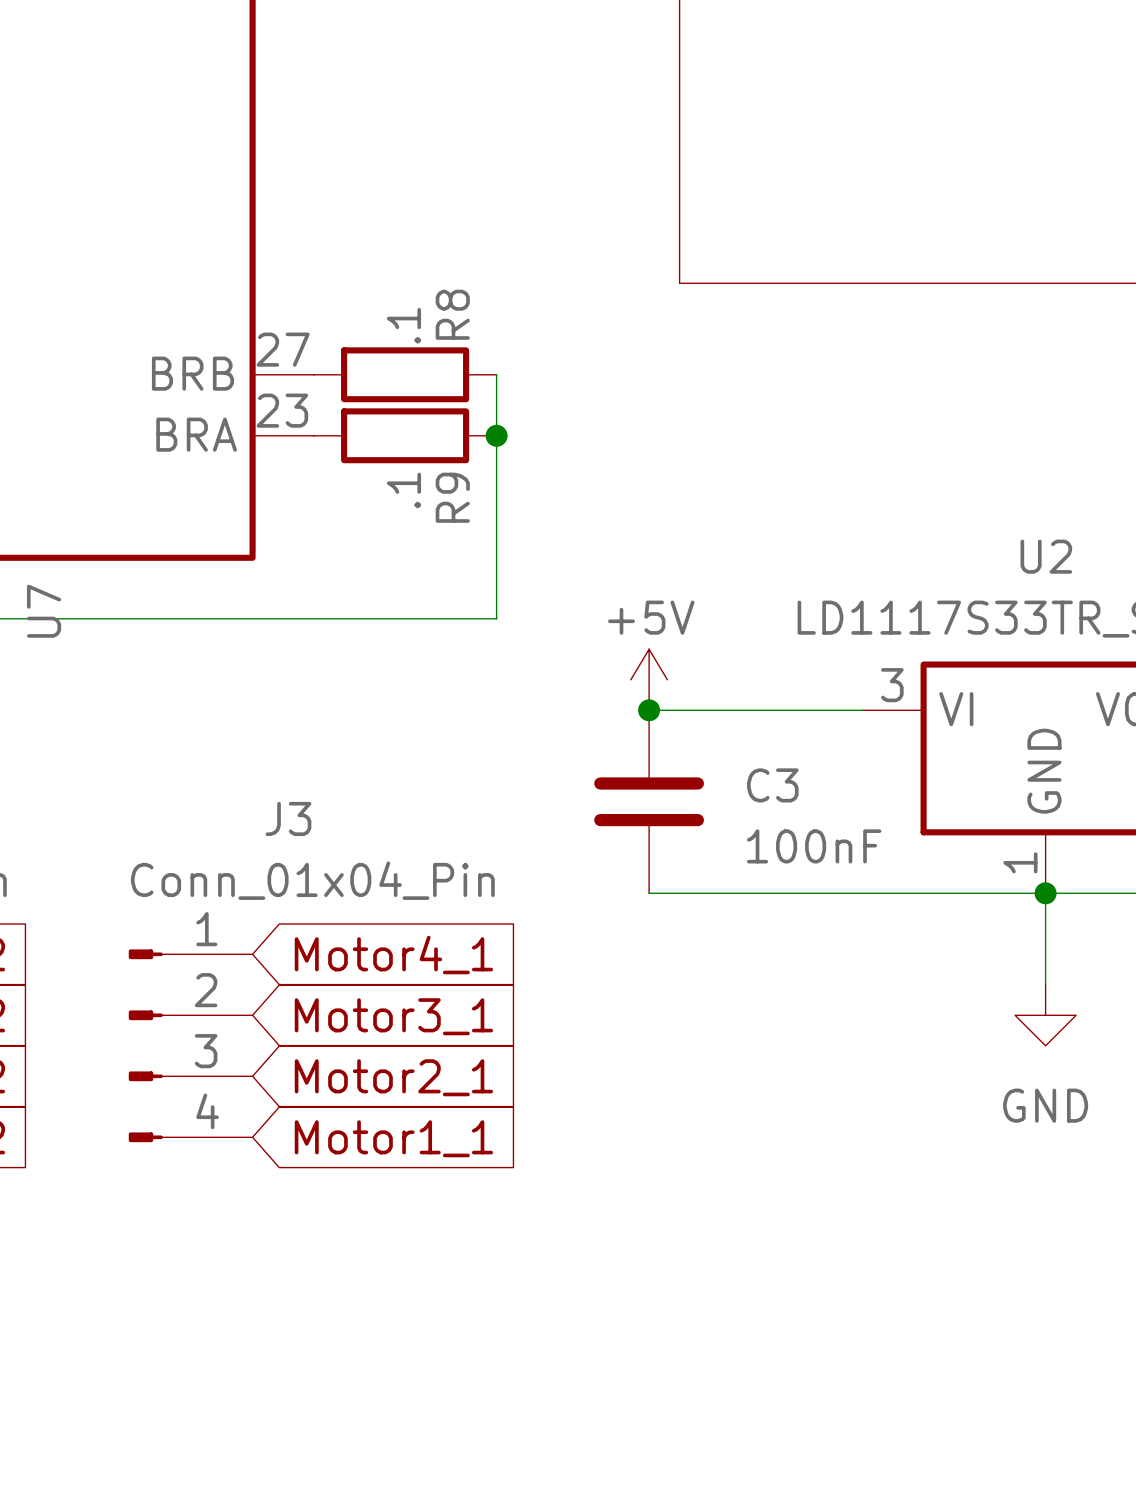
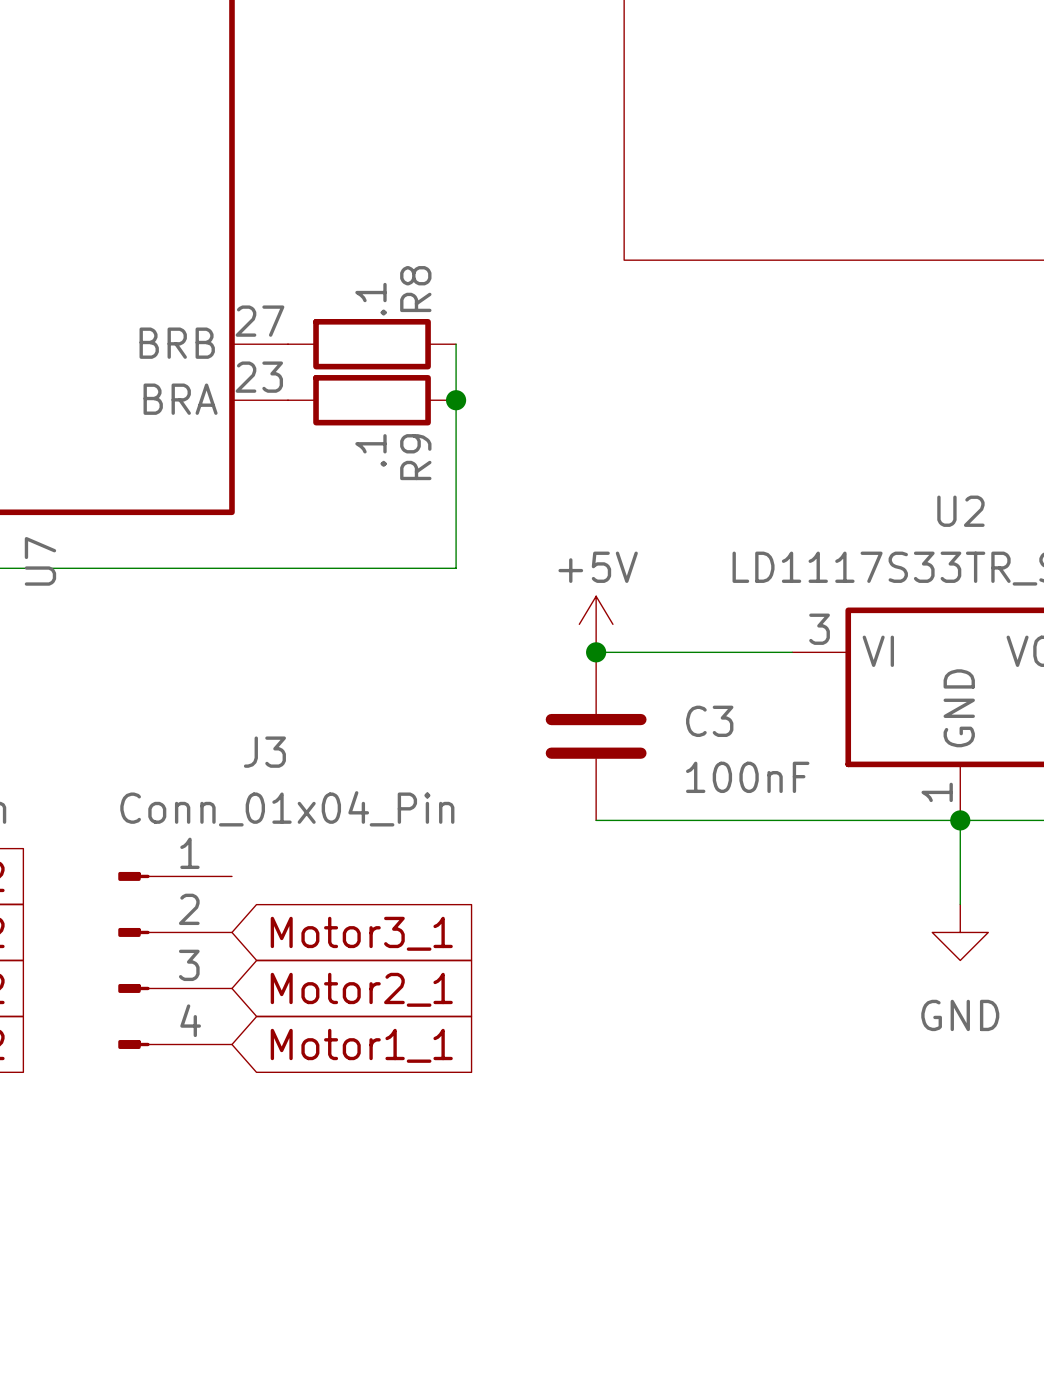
global label: Motor4_1 (393, 955) -> none

